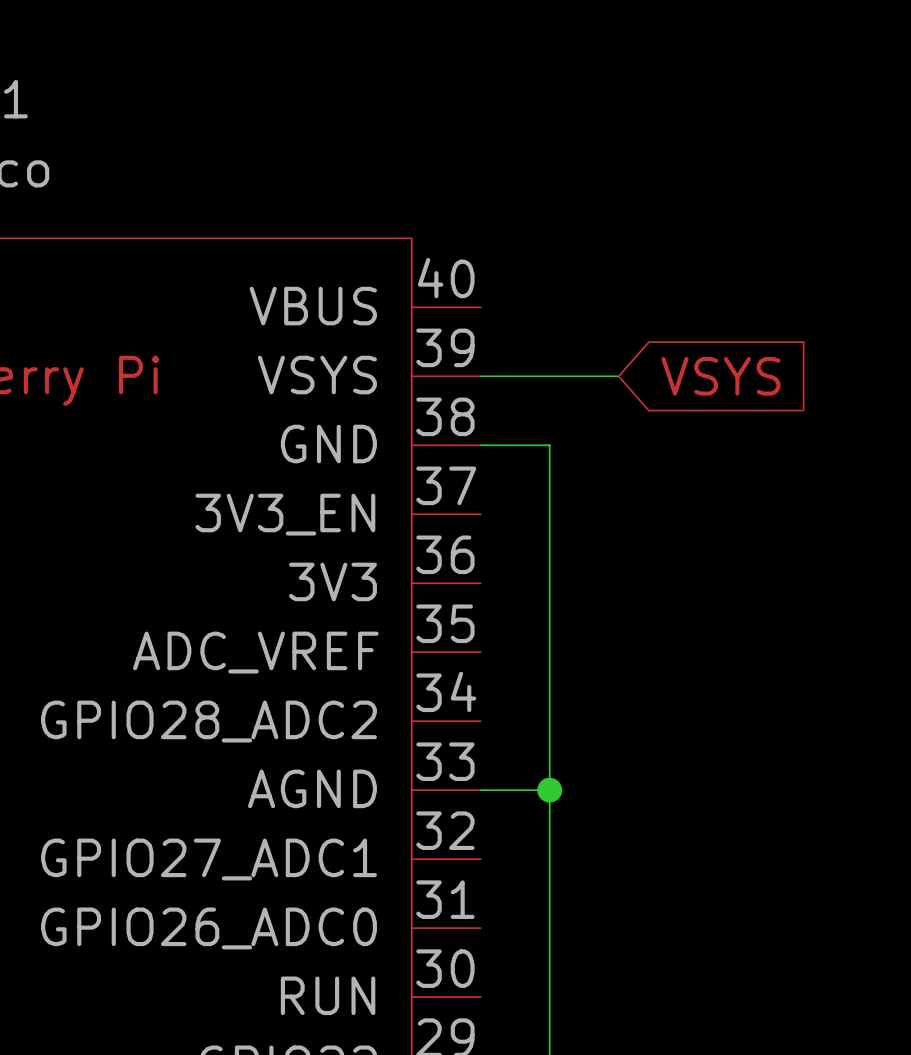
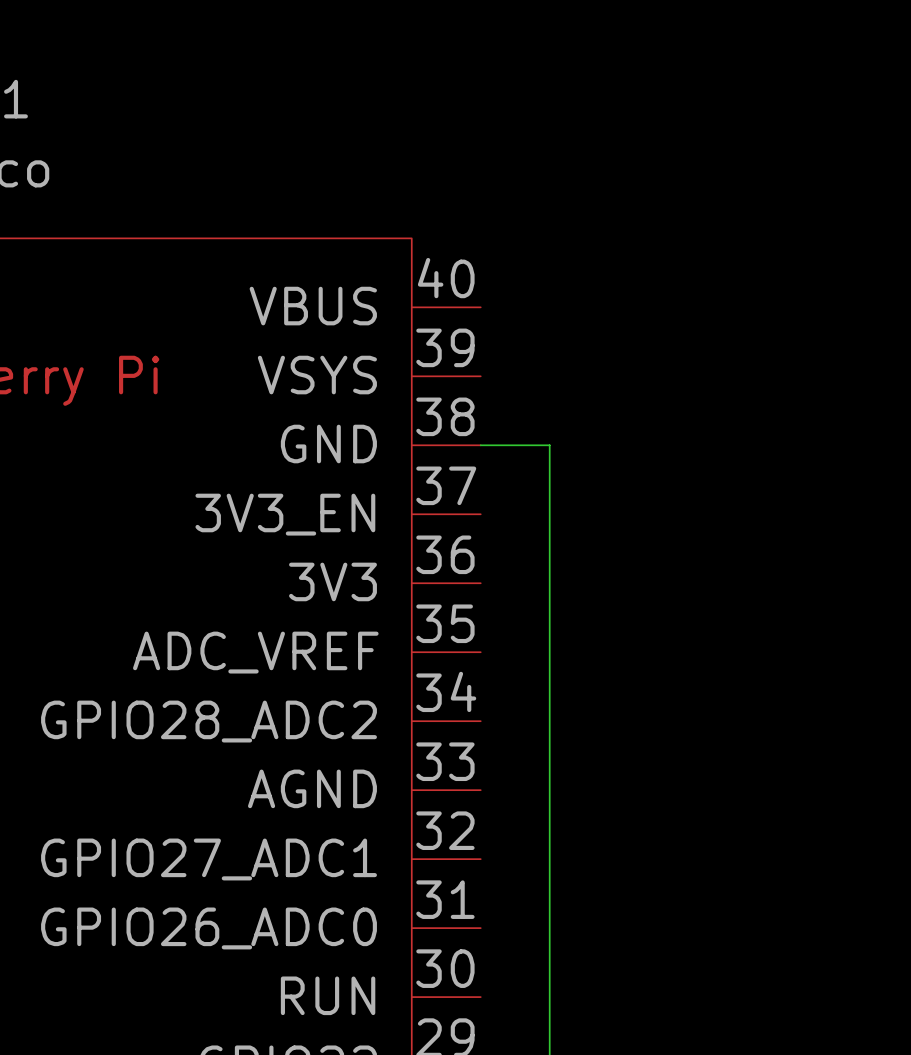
wire: (480, 376) (618, 376) -> none
global label: VSYS (720, 376) -> none
wire: (480, 790) (549, 790) -> none
junction: (549, 790) -> none

